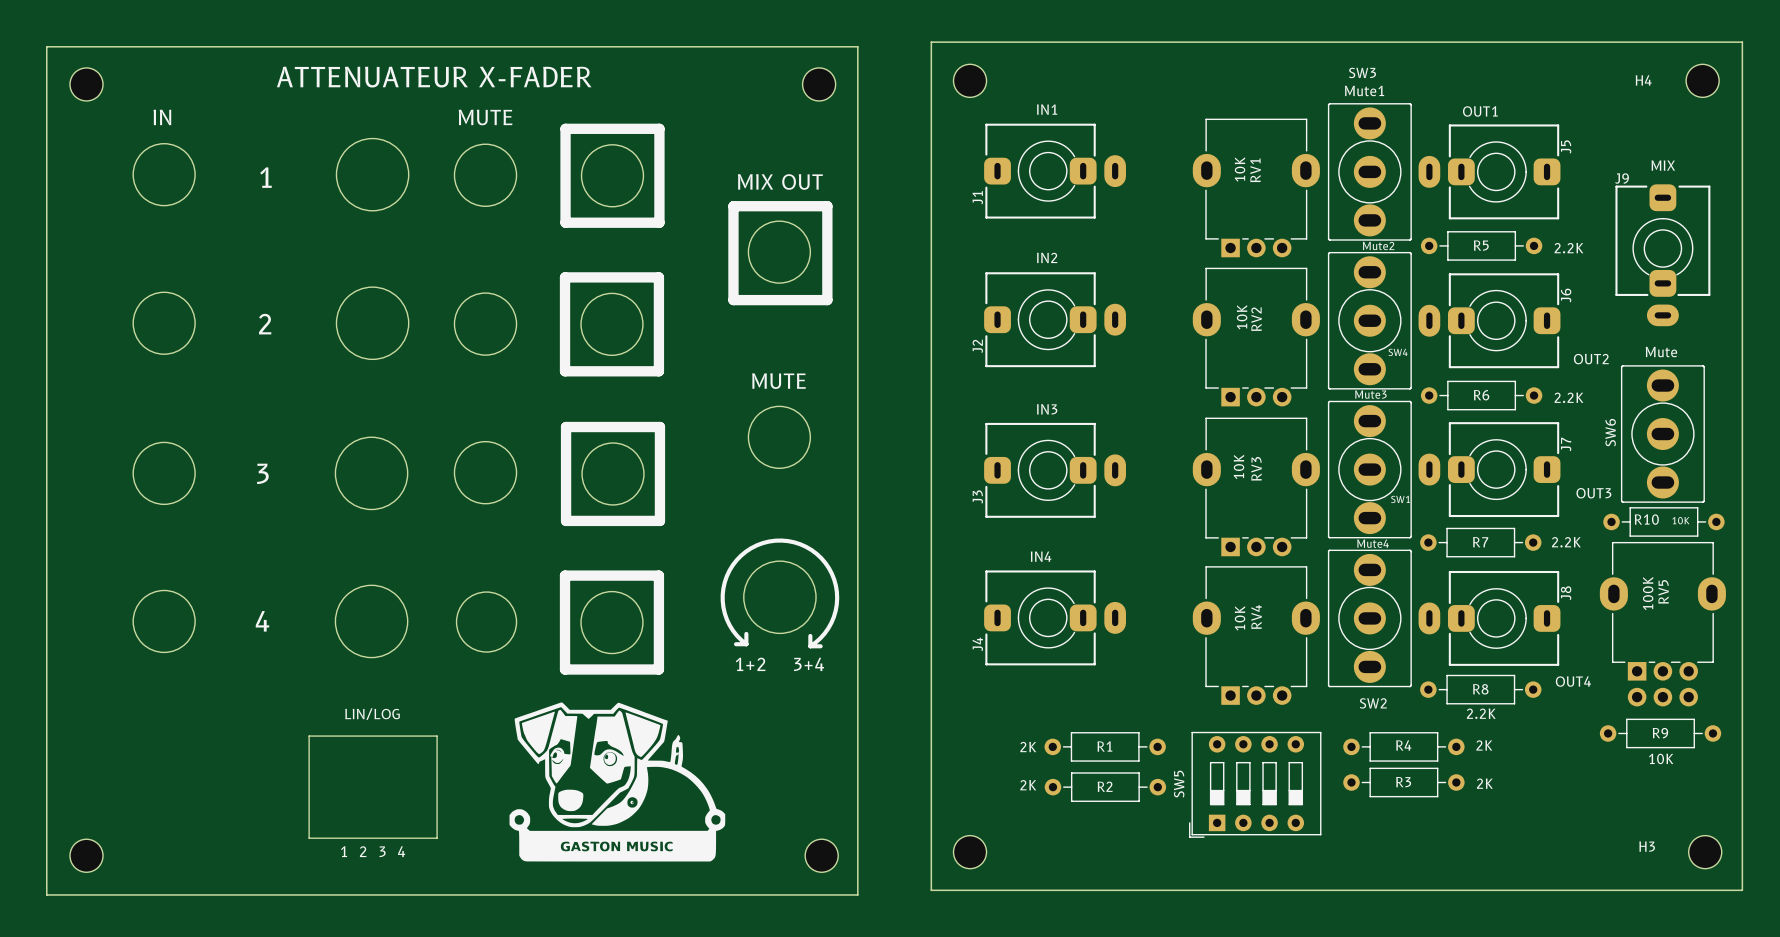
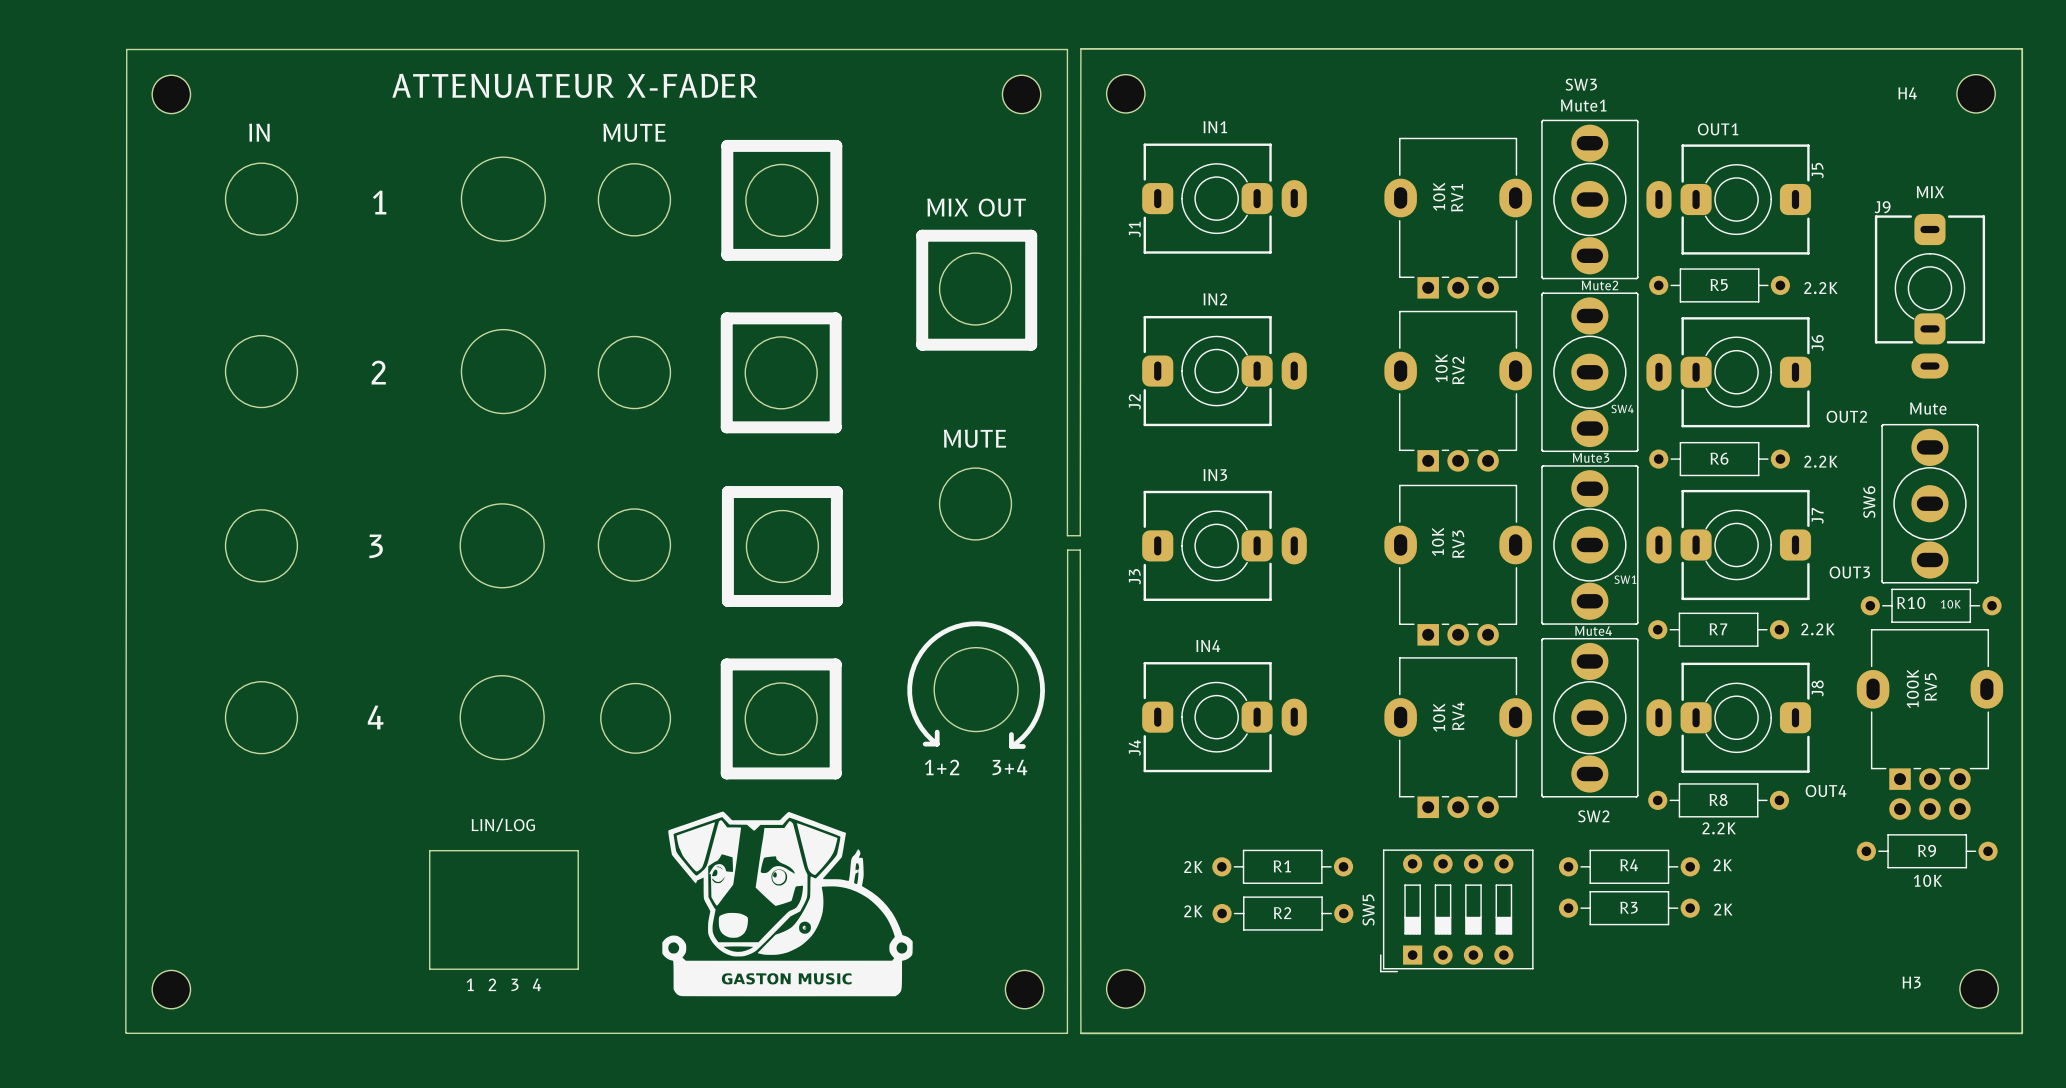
board edge: (931, 42) (931, 890) -> (1080, 48) (1080, 535) (1067, 535) (1067, 49) (126, 49) (125, 1032) (1067, 1033) (1067, 550) (1080, 550) (1080, 1033)
board edge: (46, 46) (857, 46) (857, 894) (46, 894) (46, 46) -> none
text position: ATTENUATEUR X-FADER (434, 77) -> ATTENUATEUR X-FADER (574, 85)
part position: (86, 84) -> (171, 94)
part position: (819, 84) -> (1021, 94)
text position: IN (162, 117) -> IN (259, 132)
text position: MUTE (485, 117) -> MUTE (634, 132)
line: (565, 128) (659, 128) (659, 222) (565, 222) (565, 128) -> (727, 145) (836, 145) (836, 254) (727, 254) (727, 145)
round board edge position: (164, 174) -> (261, 199)
round board edge position: (372, 174) -> (503, 199)
round board edge position: (485, 175) -> (634, 199)
round board edge position: (612, 175) -> (781, 200)
text position: 1 (265, 177) -> 1 (379, 202)
text position: MIX OUT (780, 181) -> MIX OUT (976, 207)
line: (733, 206) (827, 206) (827, 300) (733, 300) (733, 206) -> (922, 235) (1031, 235) (1031, 344) (922, 344) (922, 235)
round board edge position: (779, 252) -> (975, 289)
line: (565, 277) (658, 277) (658, 371) (565, 371) (565, 277) -> (726, 318) (835, 318) (835, 427) (726, 427) (726, 318)
round board edge position: (164, 323) -> (261, 371)
round board edge position: (372, 323) -> (503, 371)
text position: 2 (265, 324) -> 2 (378, 372)
round board edge position: (485, 324) -> (634, 372)
round board edge position: (611, 324) -> (781, 372)
text position: MUTE (778, 381) -> MUTE (975, 438)
round board edge: none -> [938, 467, 1013, 541]
round board edge: [747, 405, 811, 469] -> none
line: (566, 427) (659, 427) (659, 520) (566, 520) (566, 427) -> (727, 492) (836, 492) (836, 600) (727, 600) (727, 492)
round board edge: none -> [745, 509, 819, 584]
round board edge: [581, 442, 645, 506] -> none
round board edge position: (485, 472) -> (634, 545)
round board edge position: (164, 473) -> (261, 545)
text position: 3 (262, 473) -> 3 (376, 546)
round board edge position: (371, 473) -> (502, 545)
line: (565, 575) (565, 669) (658, 669) (658, 575) (565, 575) -> (726, 664) (726, 773) (835, 773) (835, 664) (726, 664)
round board edge position: (779, 597) -> (976, 689)
round board edge position: (164, 621) -> (261, 717)
text position: 4 (262, 621) -> 4 (375, 717)
round board edge position: (371, 621) -> (502, 717)
round board edge position: (486, 622) -> (635, 718)
round board edge position: (611, 622) -> (781, 718)
line: (746, 633) (746, 644) -> (937, 732) (937, 744)
line: (810, 635) (810, 646) (820, 646) -> (1011, 734) (1011, 746) (1023, 746)
line: (736, 644) (746, 644) -> (925, 744) (937, 744)
line: (746, 644) (733, 630) (724, 613) (722, 594) (726, 576) (736, 560) (751, 548) (762, 543) (781, 540) (800, 544) (816, 553) (828, 568) (835, 585) (836, 604) (831, 622) (820, 638) (810, 646) -> (937, 744) (921, 728) (914, 715) (909, 694) (912, 672) (921, 652) (936, 636) (956, 626) (978, 623) (992, 625) (1012, 634) (1028, 649) (1039, 669) (1042, 690) (1038, 712) (1028, 731) (1011, 746)
text position: 1+2 3+4 (779, 664) -> 1+2 3+4 (976, 767)
text position: LIN/LOG (372, 714) -> LIN/LOG (503, 825)
board edge: (309, 736) (437, 736) (437, 838) (309, 838) (309, 736) -> (429, 850) (578, 850) (578, 969) (429, 969) (429, 850)
drawing position: (617, 781) -> (787, 903)
text position: 1 2 3 4 (373, 851) -> 1 2 3 4 (503, 984)
part position: (86, 855) -> (171, 989)
part position: (821, 855) -> (1024, 989)

